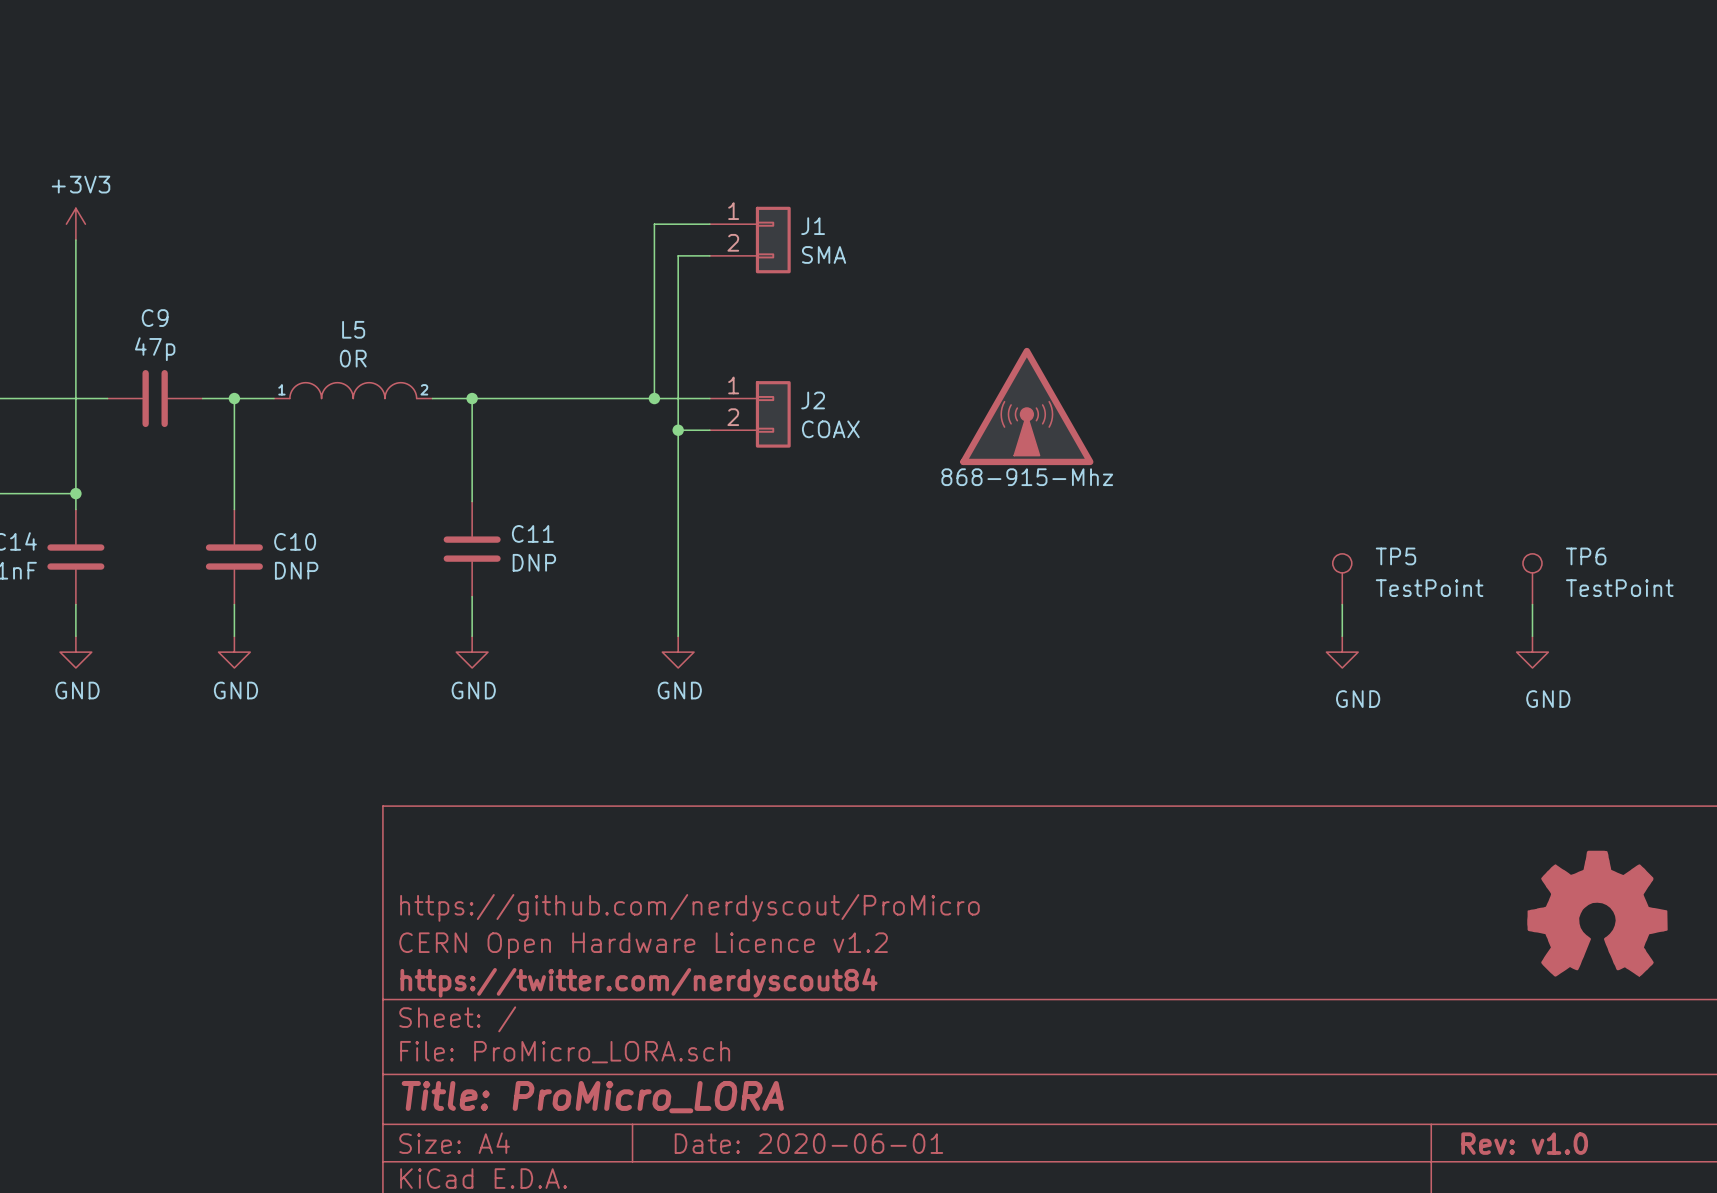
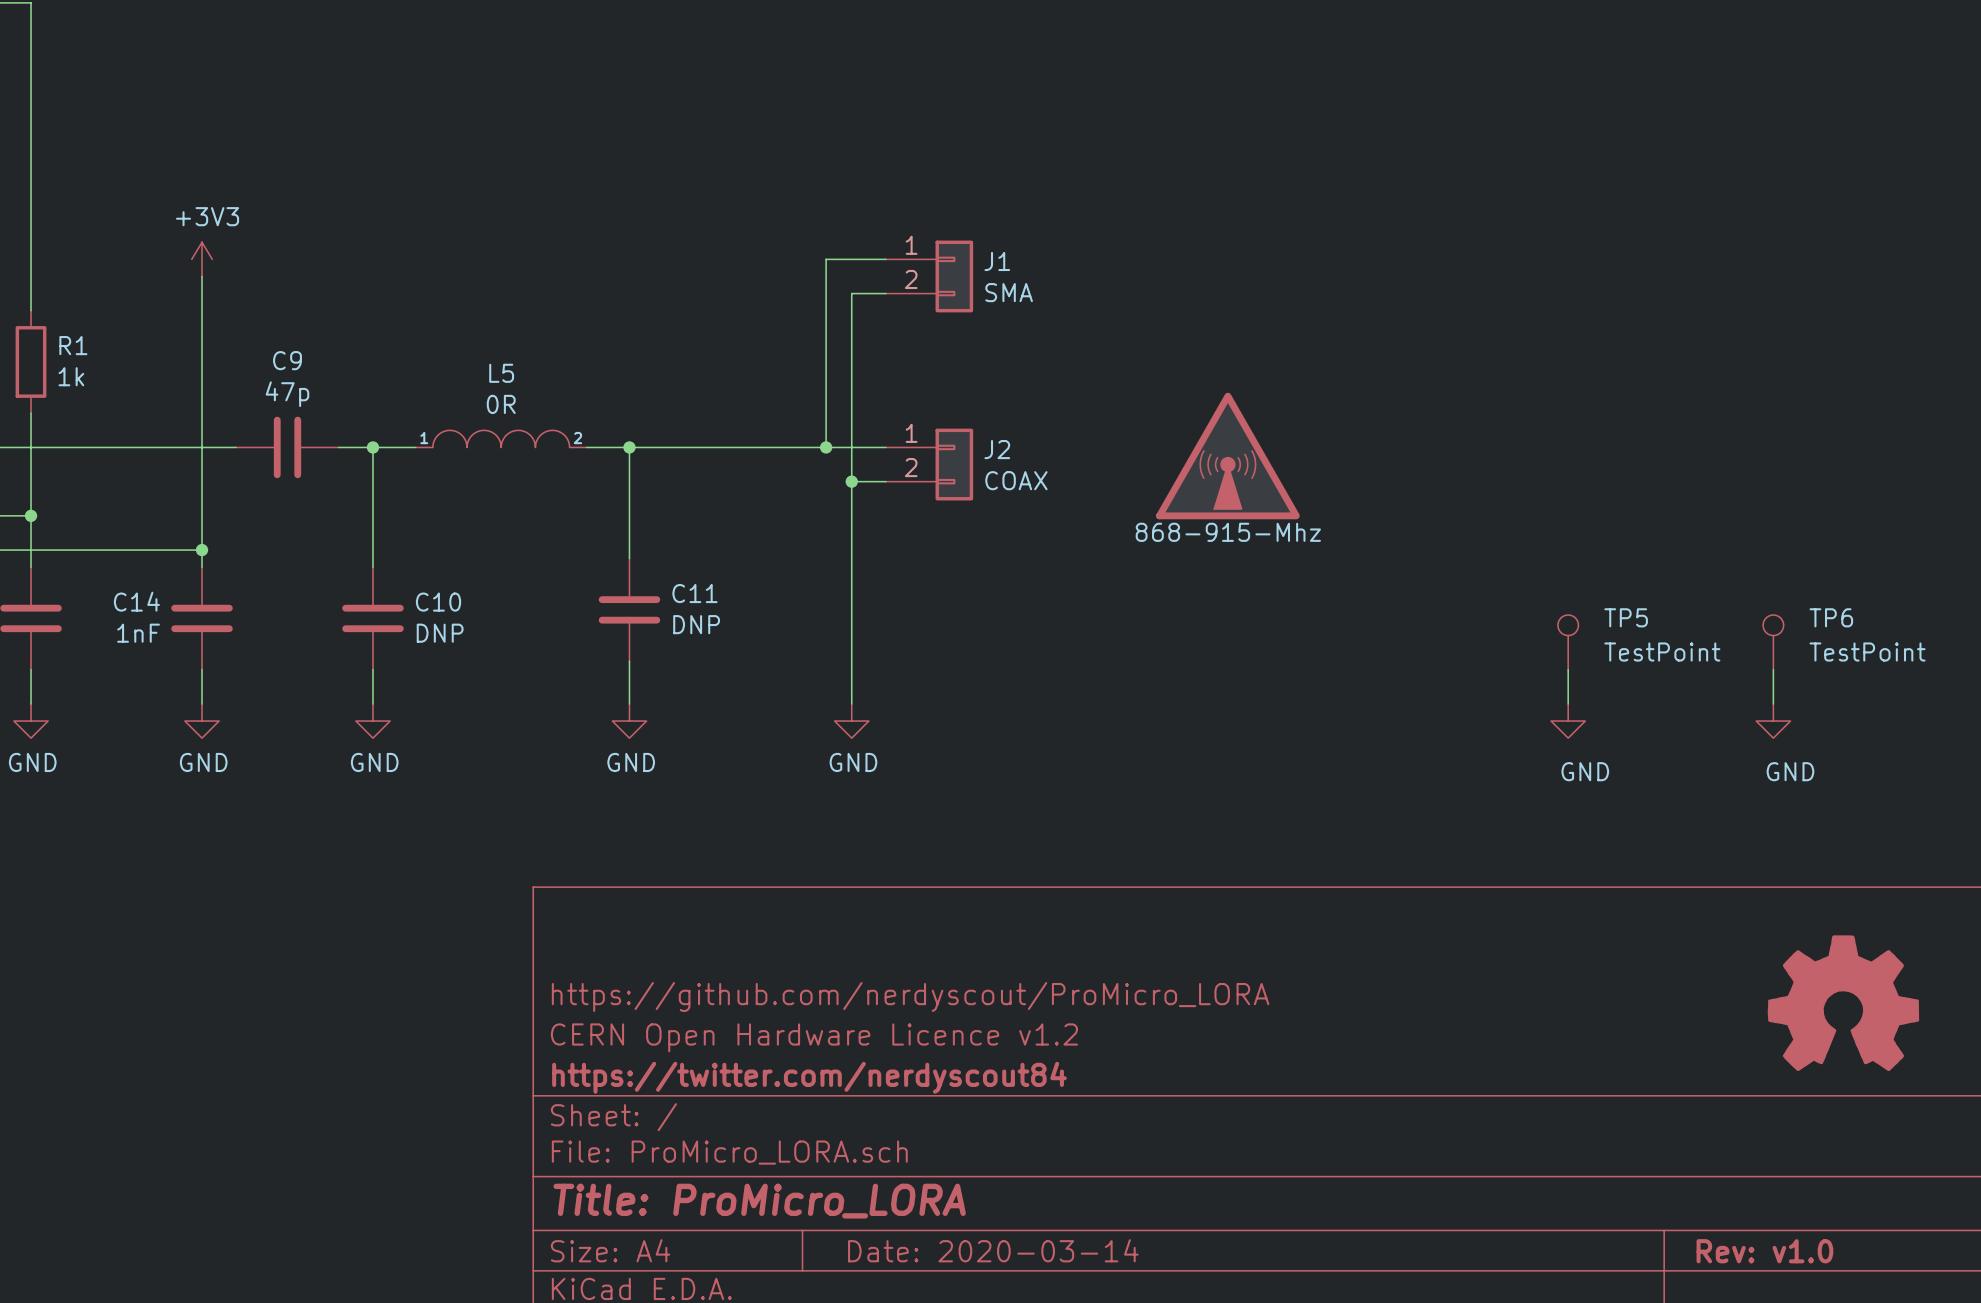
title block: https://github.com/nerdyscout/ProMicro (689, 907) -> https://github.com/nerdyscout/ProMicro_LORA (910, 996)
title block: Date: 2020-06-01 (808, 1143) -> Date: 2020-03-14 (993, 1250)

